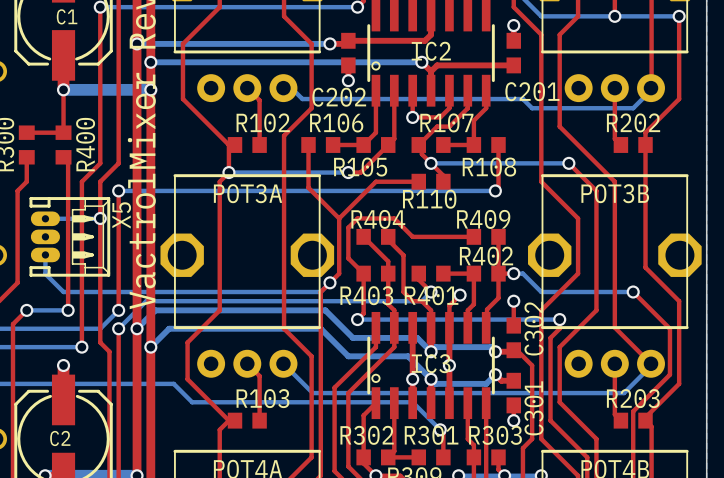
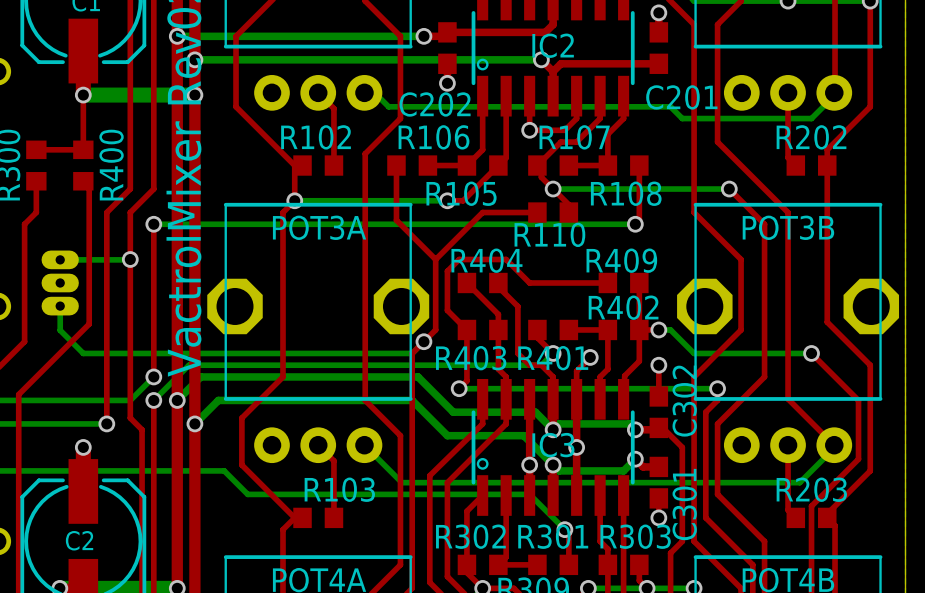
R102 name position: R102 (263, 122) -> R102 (316, 137)
X5 side: top (69, 236) -> bottom (60, 282)
top track: (68, 269) (68, 310) -> (89, 324) (36, 376)
bottom track: (26, 310) (68, 310) -> none
via: (26, 310) -> none
via: (68, 310) -> none

